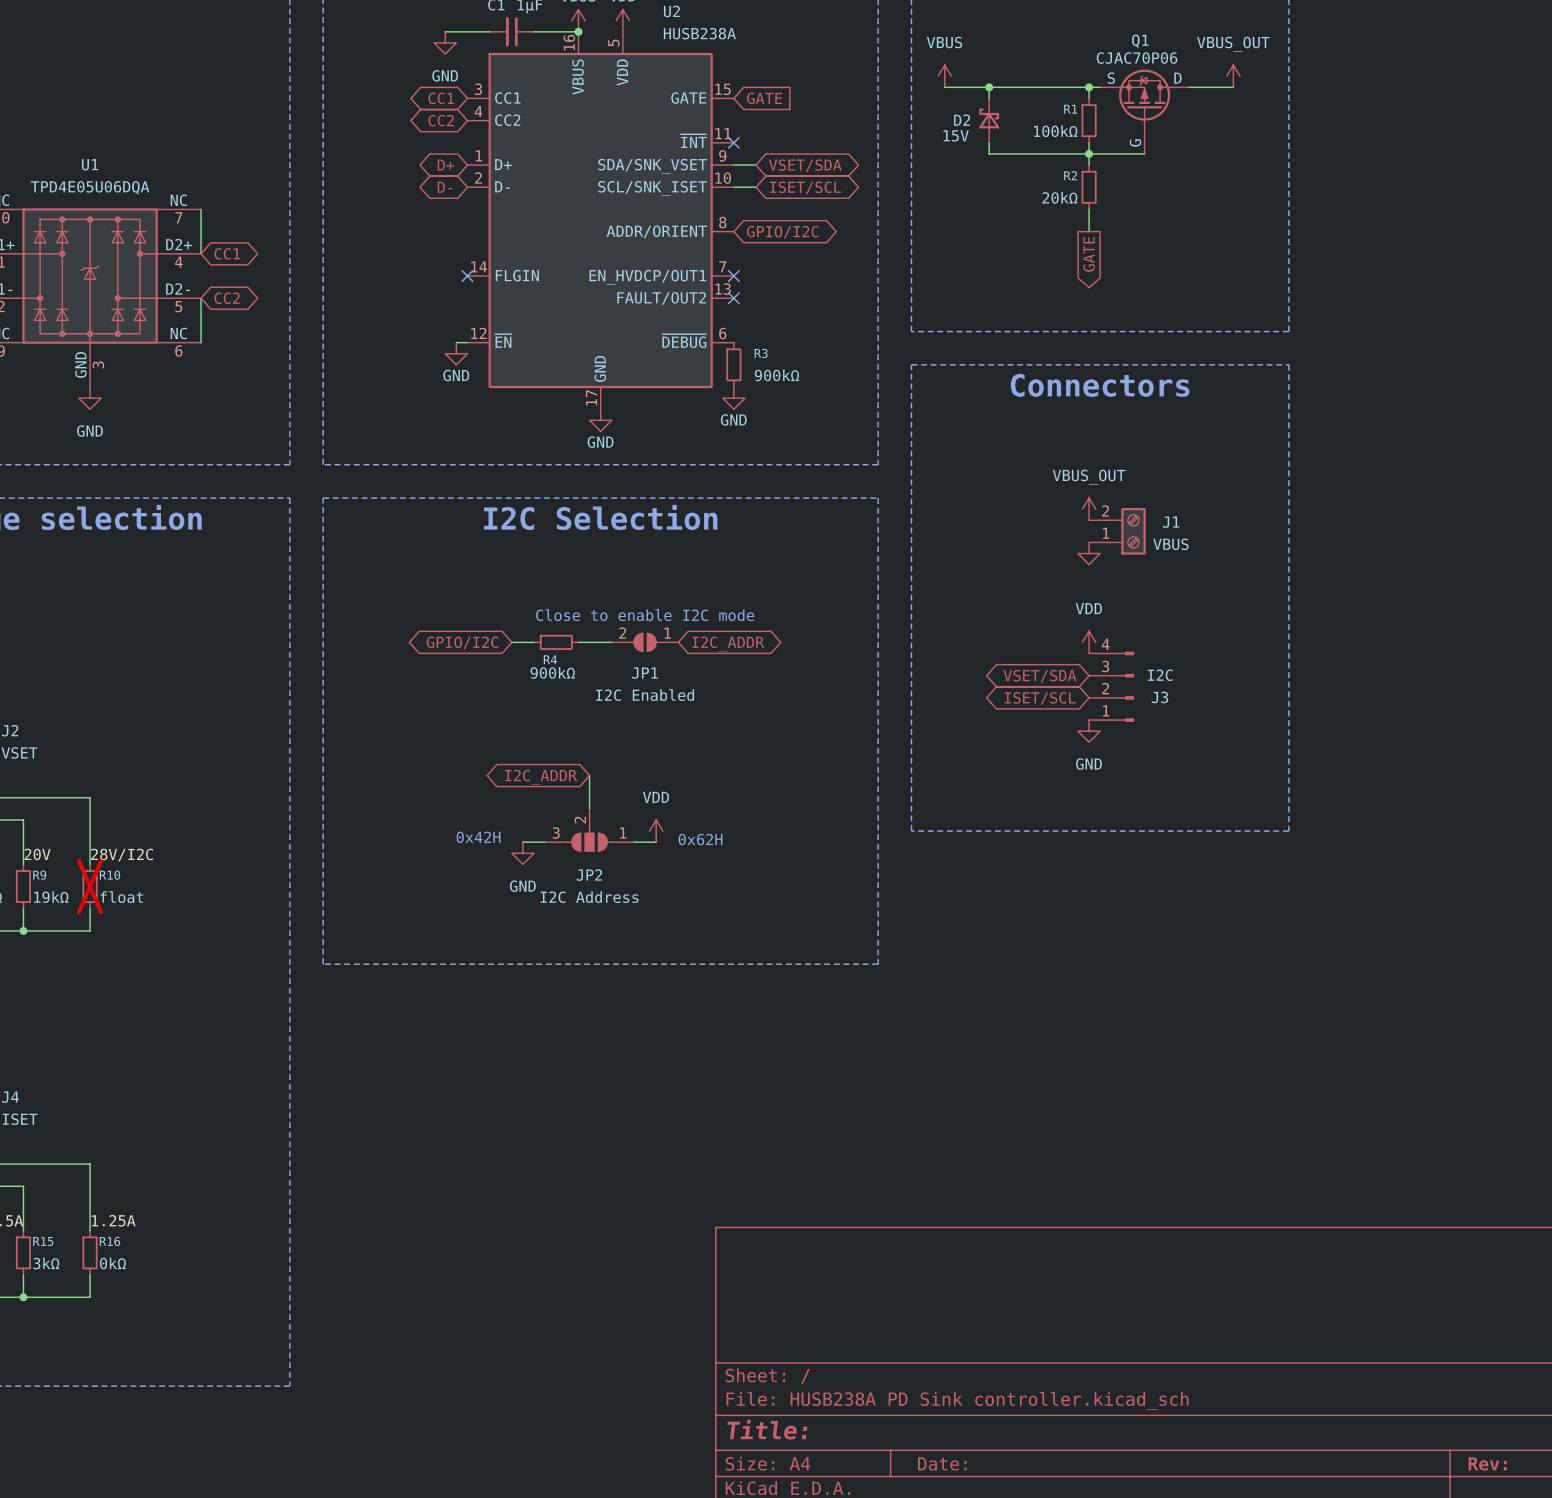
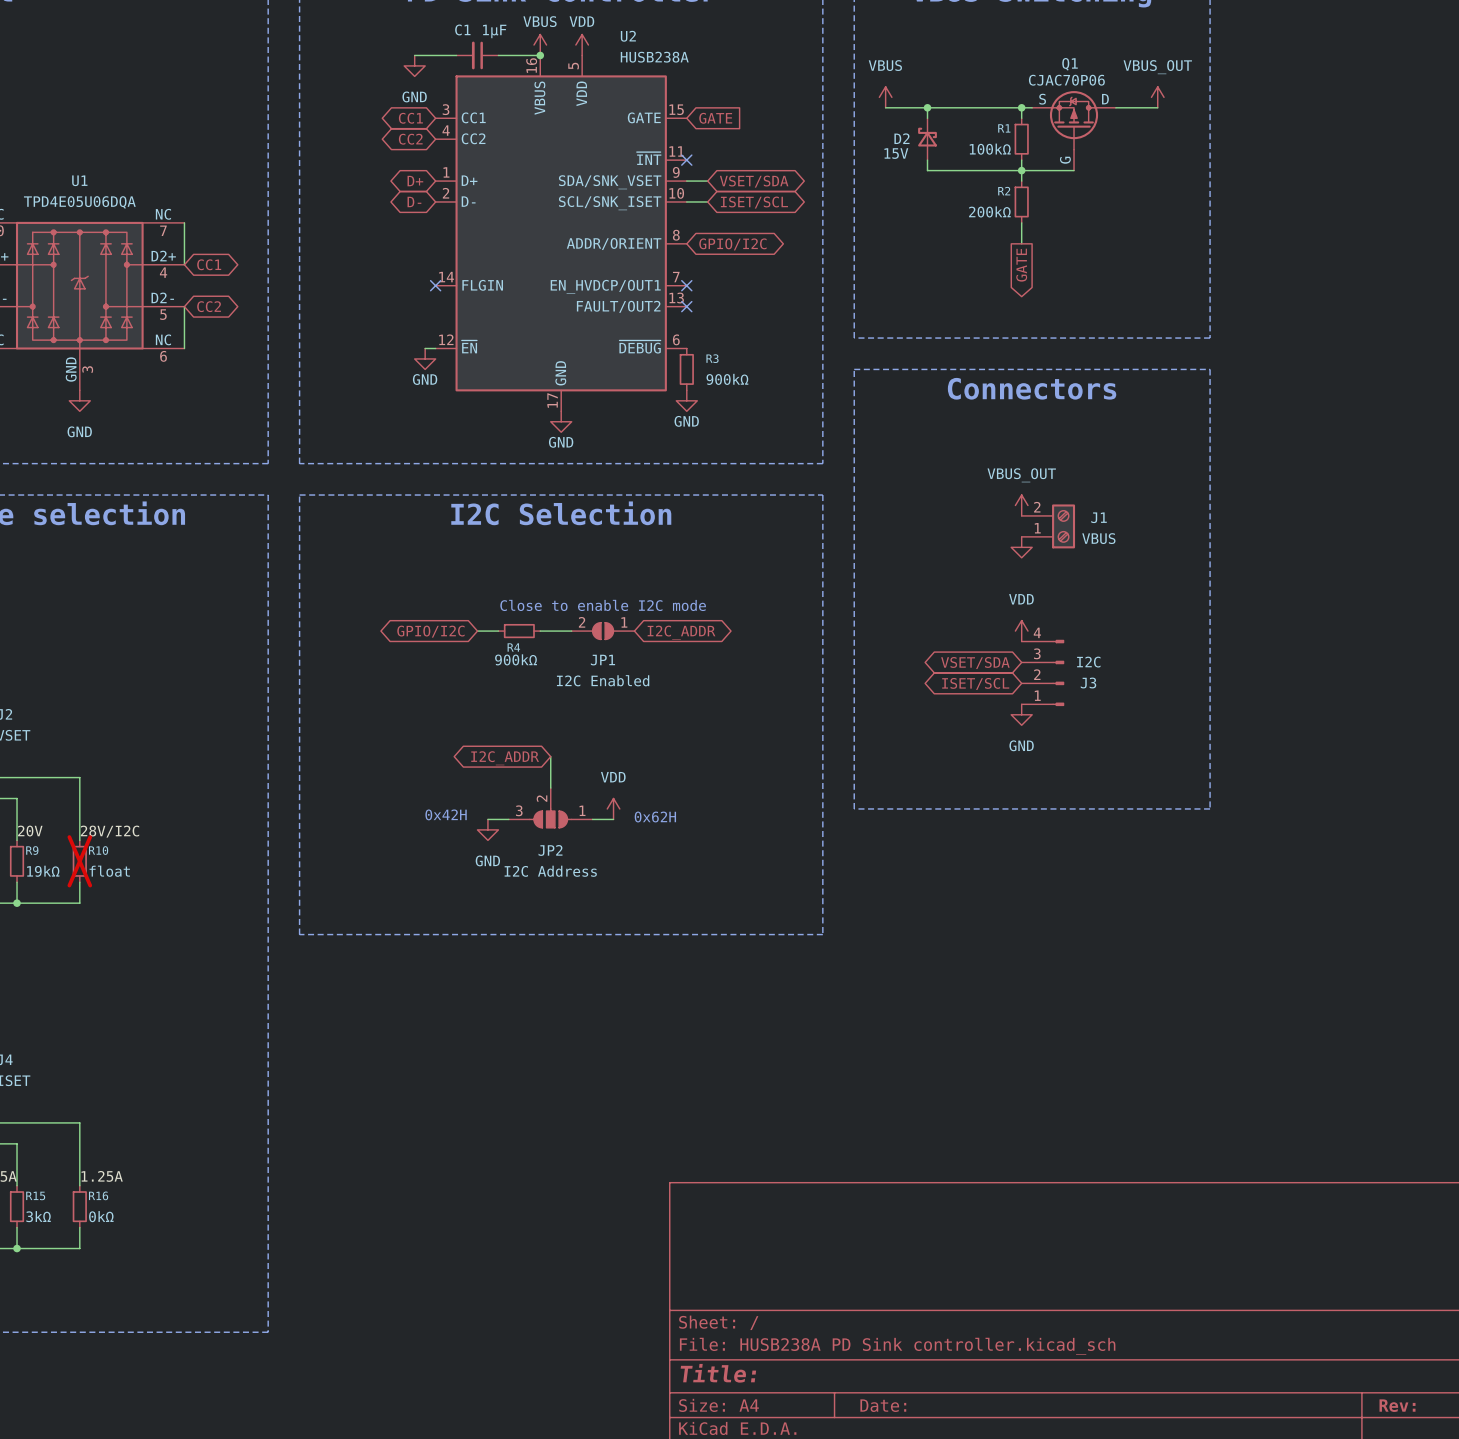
R2 value: 20kΩ (1059, 197) -> 200kΩ (989, 211)

